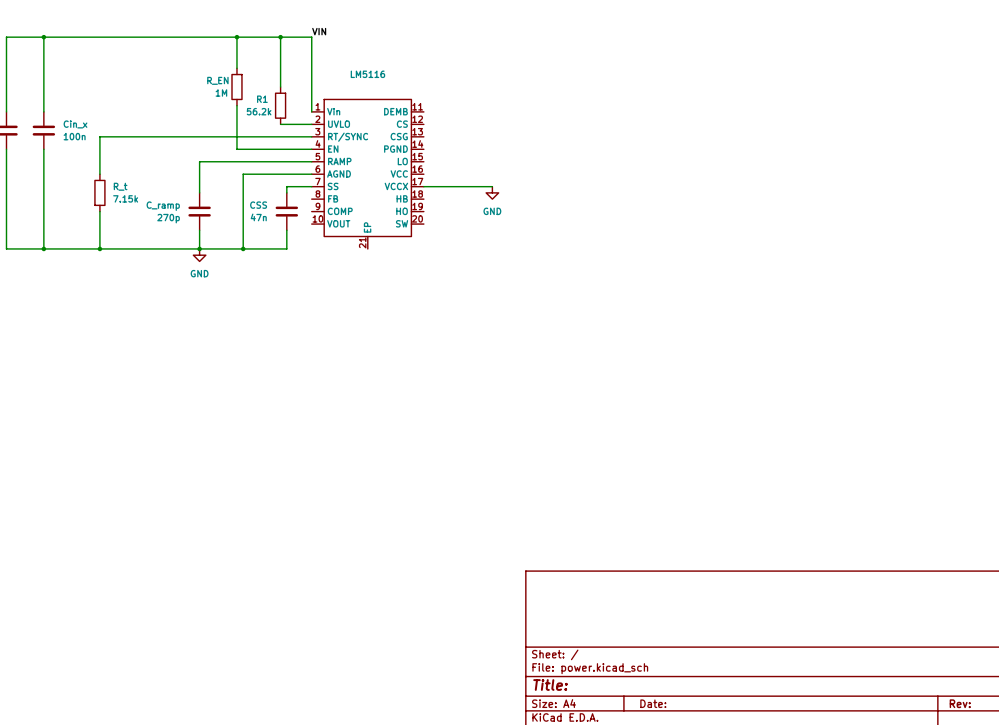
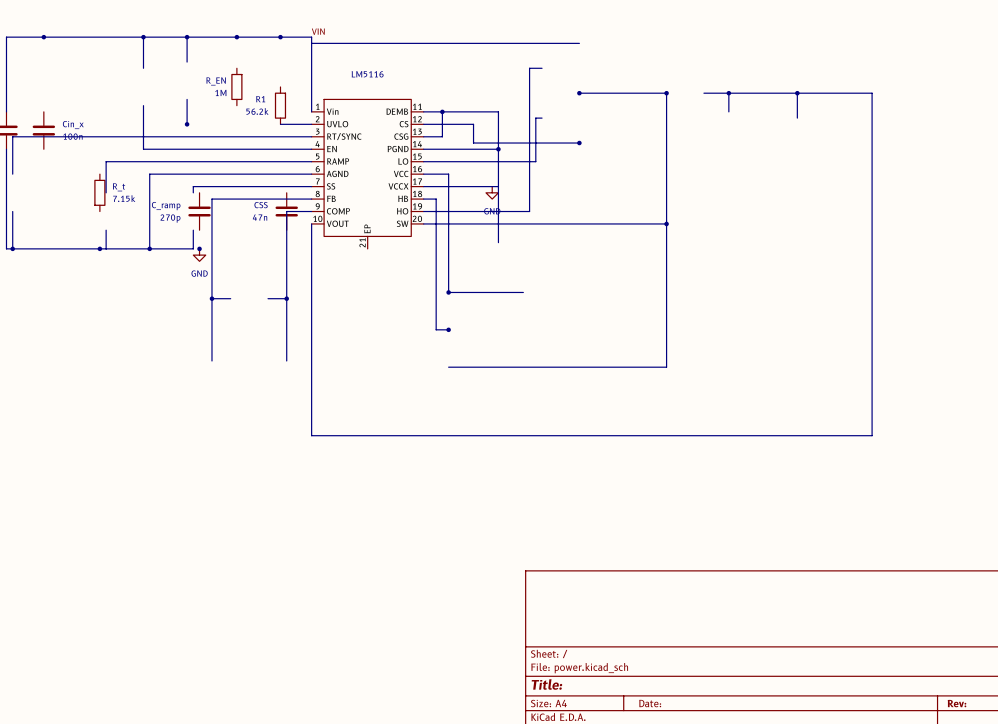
wire: (43, 37) (43, 111) -> none
junction: none -> (143, 37)
wire: none -> (187, 37) (187, 62)
junction: none -> (187, 37)
wire: (236, 37) (236, 68) -> (143, 37) (143, 68)
wire: (280, 37) (280, 87) -> none
wire: none -> (311, 43) (579, 43)
wire: none -> (542, 68) (529, 68) (529, 211) (423, 211)
wire: none -> (579, 93) (666, 93) (666, 367) (448, 367)
junction: none -> (579, 93)
junction: none -> (666, 93)
wire: none -> (703, 93) (872, 93) (872, 435) (311, 435) (311, 223)
wire: none -> (728, 93) (728, 111)
junction: none -> (728, 93)
wire: none -> (797, 93) (797, 118)
junction: none -> (797, 93)
wire: none -> (187, 99) (187, 124)
wire: (236, 105) (236, 149) -> (143, 105) (143, 149) (236, 149)
wire: none -> (423, 111) (498, 111) (498, 242)
wire: none -> (442, 111) (442, 136) (423, 136)
junction: none -> (442, 111)
wire: none -> (542, 118) (535, 118) (535, 161) (423, 161)
junction: none -> (187, 124)
wire: none -> (423, 124) (473, 124) (473, 143) (579, 143)
wire: (99, 136) (99, 174) -> (99, 136) (12, 136) (12, 174)
junction: none -> (579, 143)
wire: (43, 149) (43, 248) -> none
wire: none -> (423, 149) (498, 149)
junction: none -> (498, 149)
wire: (199, 161) (199, 192) -> (199, 161) (106, 161) (106, 192)
wire: (243, 174) (243, 248) -> (243, 174) (149, 174) (149, 248)
wire: none -> (423, 174) (448, 174) (448, 292) (523, 292)
wire: (286, 186) (286, 192) -> (286, 186) (193, 186) (193, 192)
wire: none -> (492, 186) (498, 186)
wire: none -> (311, 199) (211, 199) (211, 360)
wire: none -> (423, 199) (436, 199) (436, 329) (448, 329)
wire: (99, 211) (99, 248) -> (12, 211) (12, 248)
wire: none -> (311, 211) (286, 211) (286, 230)
wire: none -> (423, 223) (666, 223)
junction: none -> (666, 223)
wire: (199, 230) (199, 248) -> (106, 230) (106, 248)
junction: none -> (12, 248)
junction: (43, 248) -> none
junction: none -> (149, 248)
wire: (193, 248) (286, 248) -> (193, 248) (193, 230)
junction: (243, 248) -> none
wire: none -> (286, 248) (286, 360)
junction: none -> (448, 292)
wire: none -> (211, 298) (230, 298)
junction: none -> (211, 298)
wire: none -> (268, 298) (286, 298)
junction: none -> (286, 298)
junction: none -> (448, 329)

